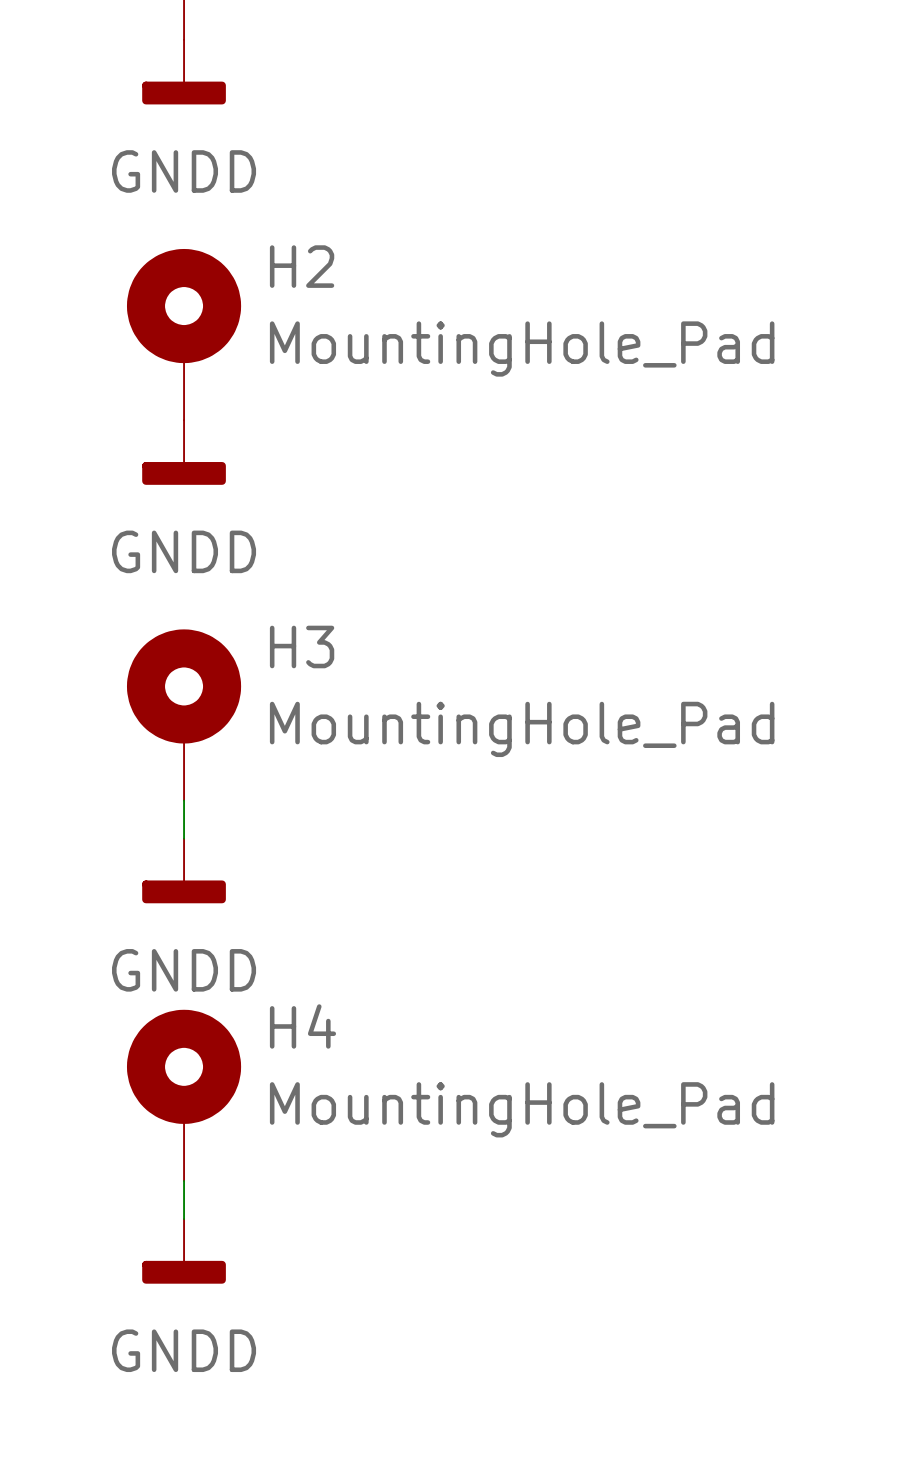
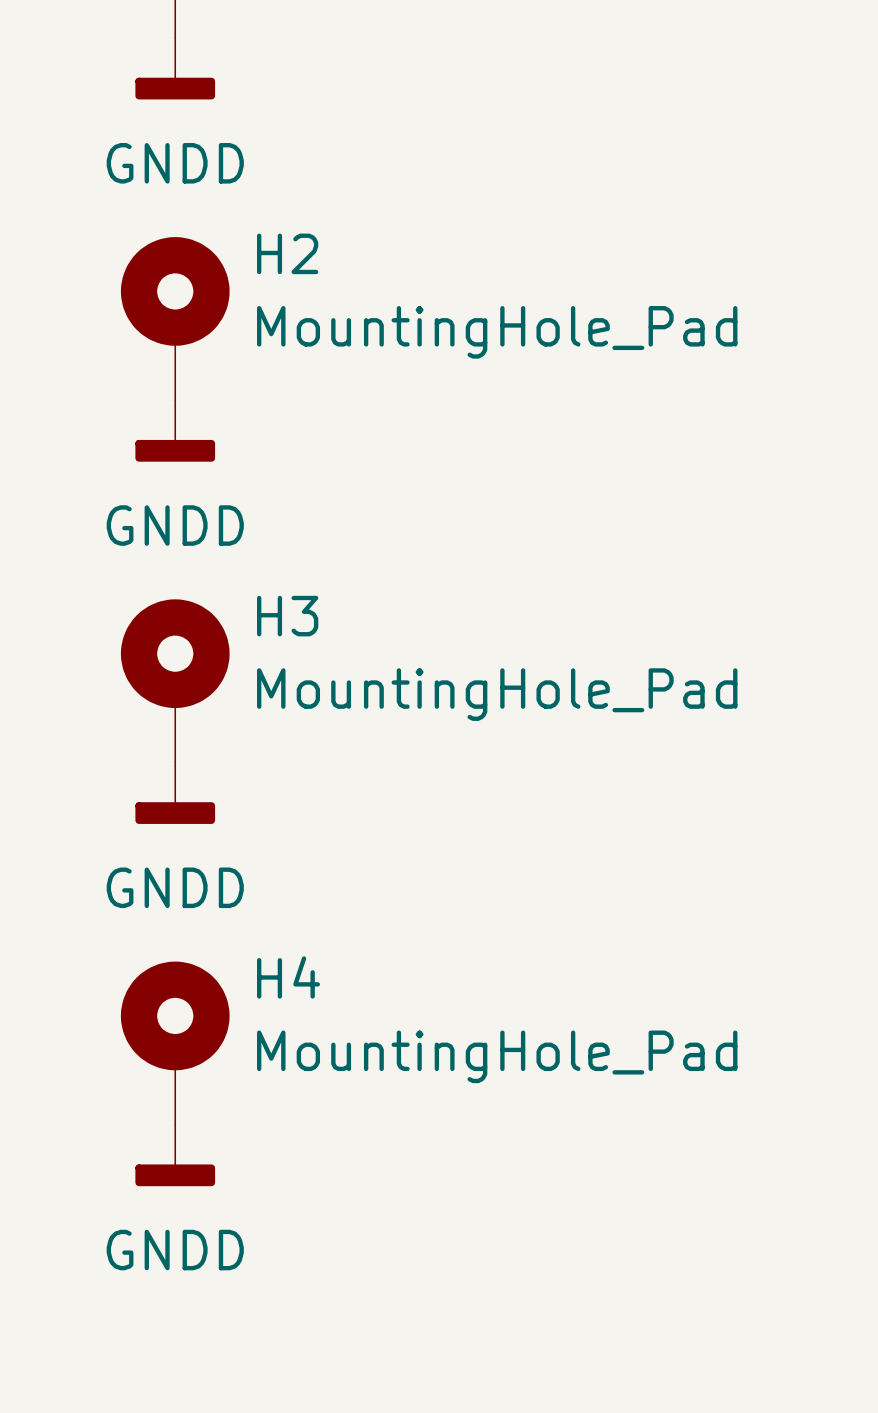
power symbol position: GNDD (184, 870) -> GNDD (175, 793)
power symbol position: GNDD (184, 1251) -> GNDD (175, 1155)

